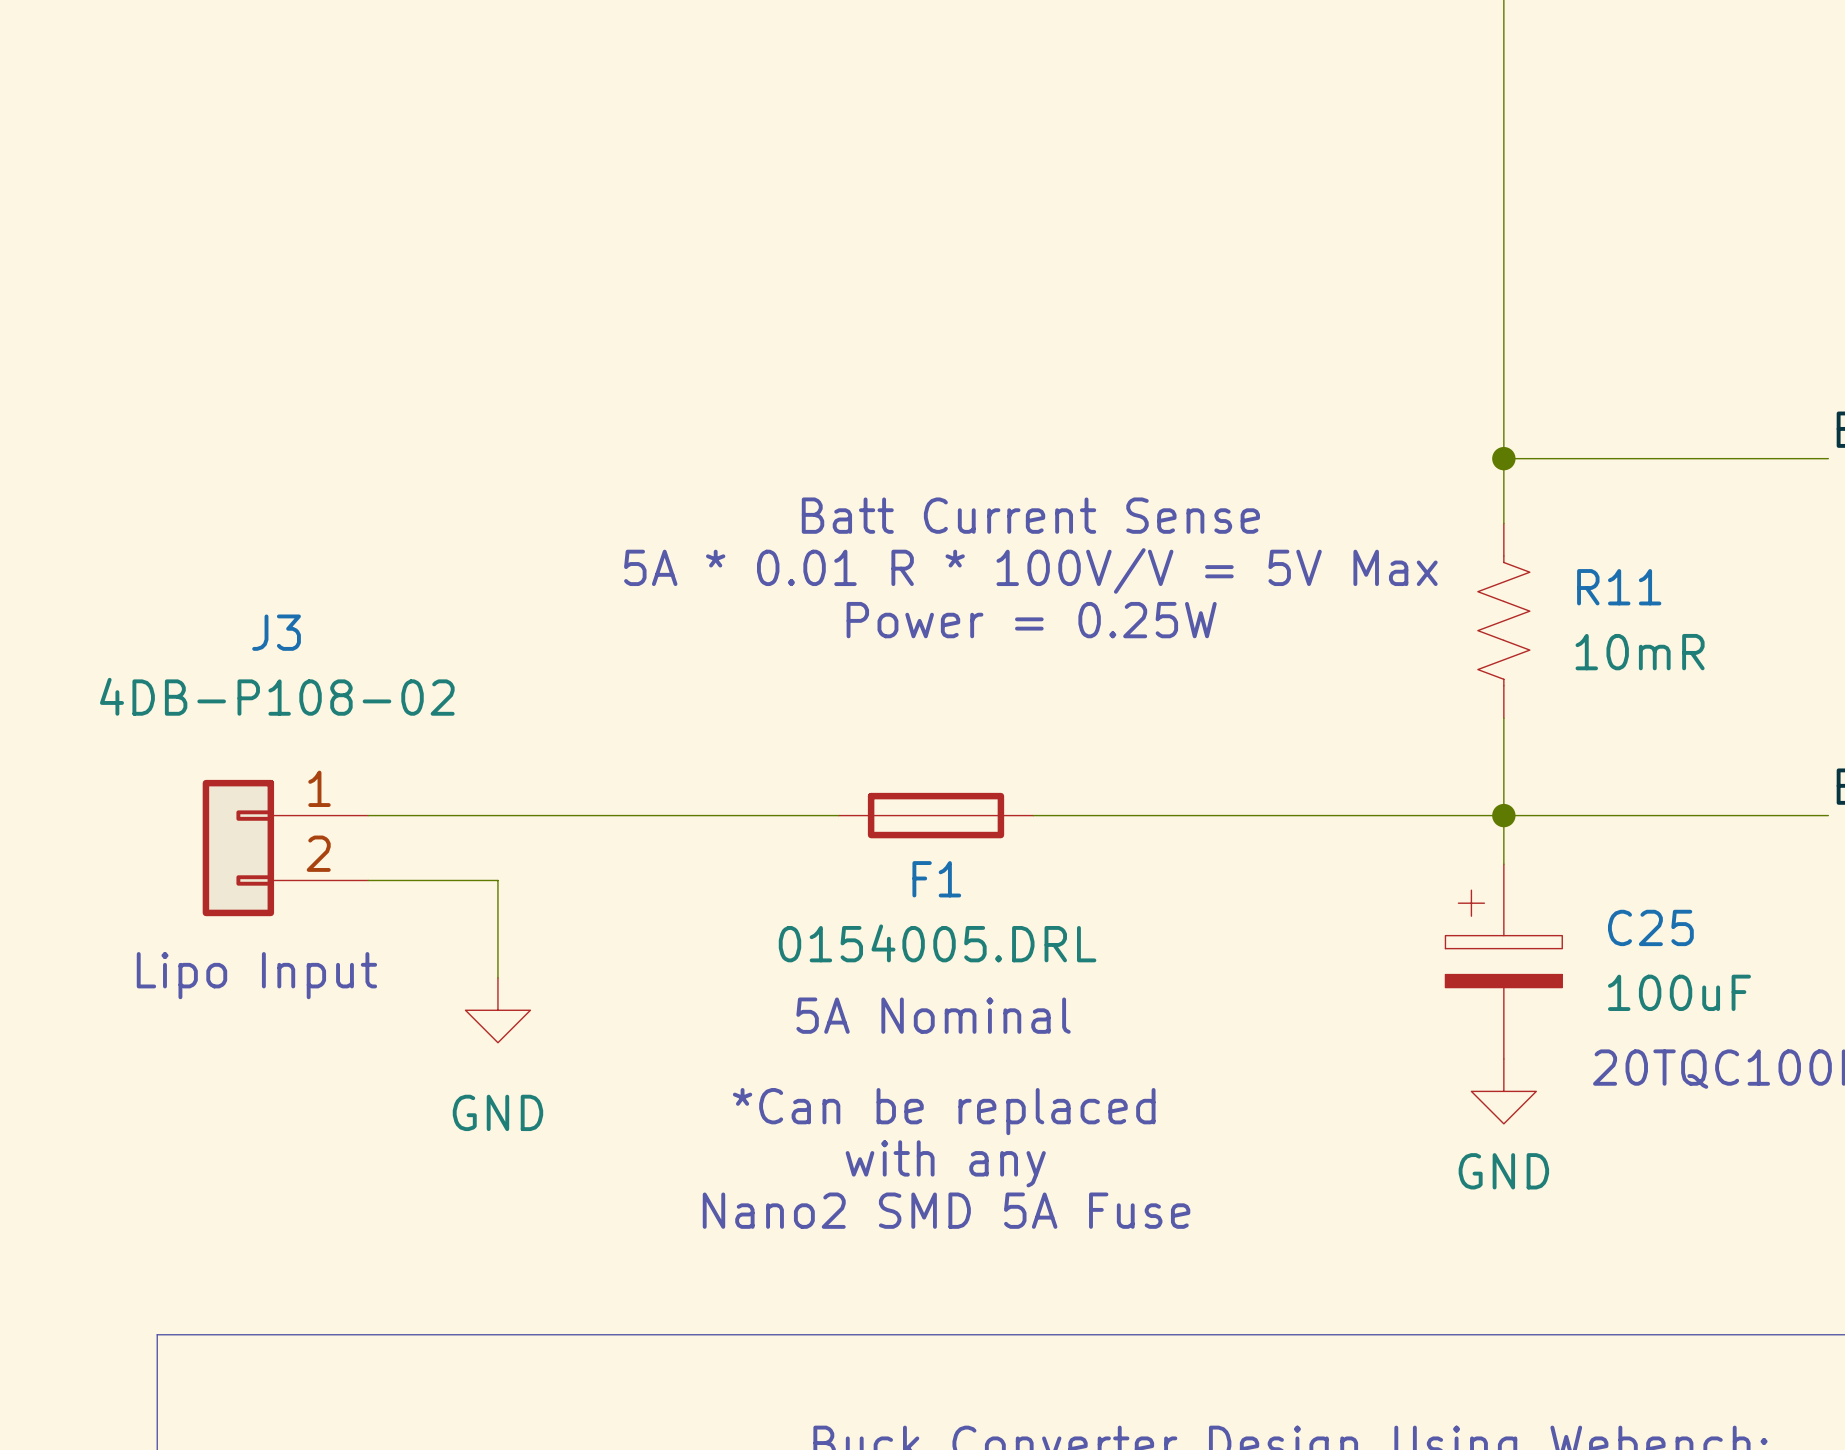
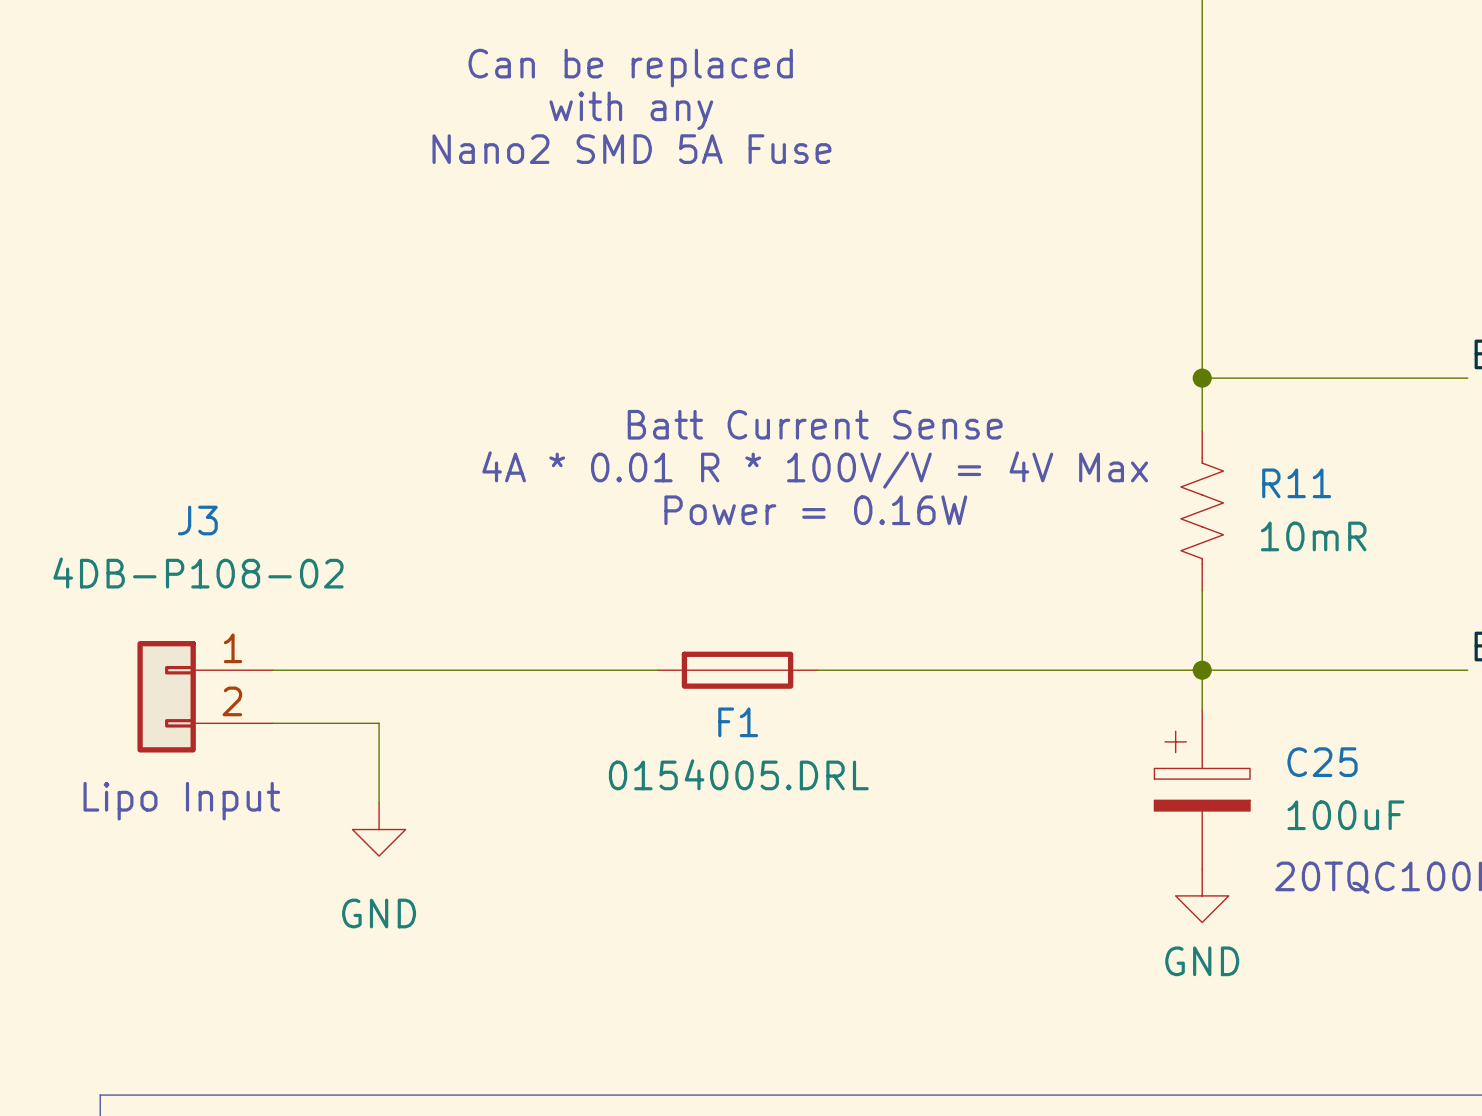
text: none -> Can be replaced (630, 68)
text: none -> with any (631, 110)
text: none -> Nano2 SMD 5A Fuse (631, 149)
text: 5A * 0.01 R * 100V/V = 5V Max (1030, 570) -> 4A * 0.01 R * 100V/V = 4V Max (815, 470)
text: Power = 0.25W (1031, 620) -> Power = 0.16W (815, 510)
text: 5A Nominal (933, 1015) -> none
text: *Can be replaced (944, 1111) -> none
text: with any (945, 1163) -> none
text: Nano2 SMD 5A Fuse (946, 1210) -> none

